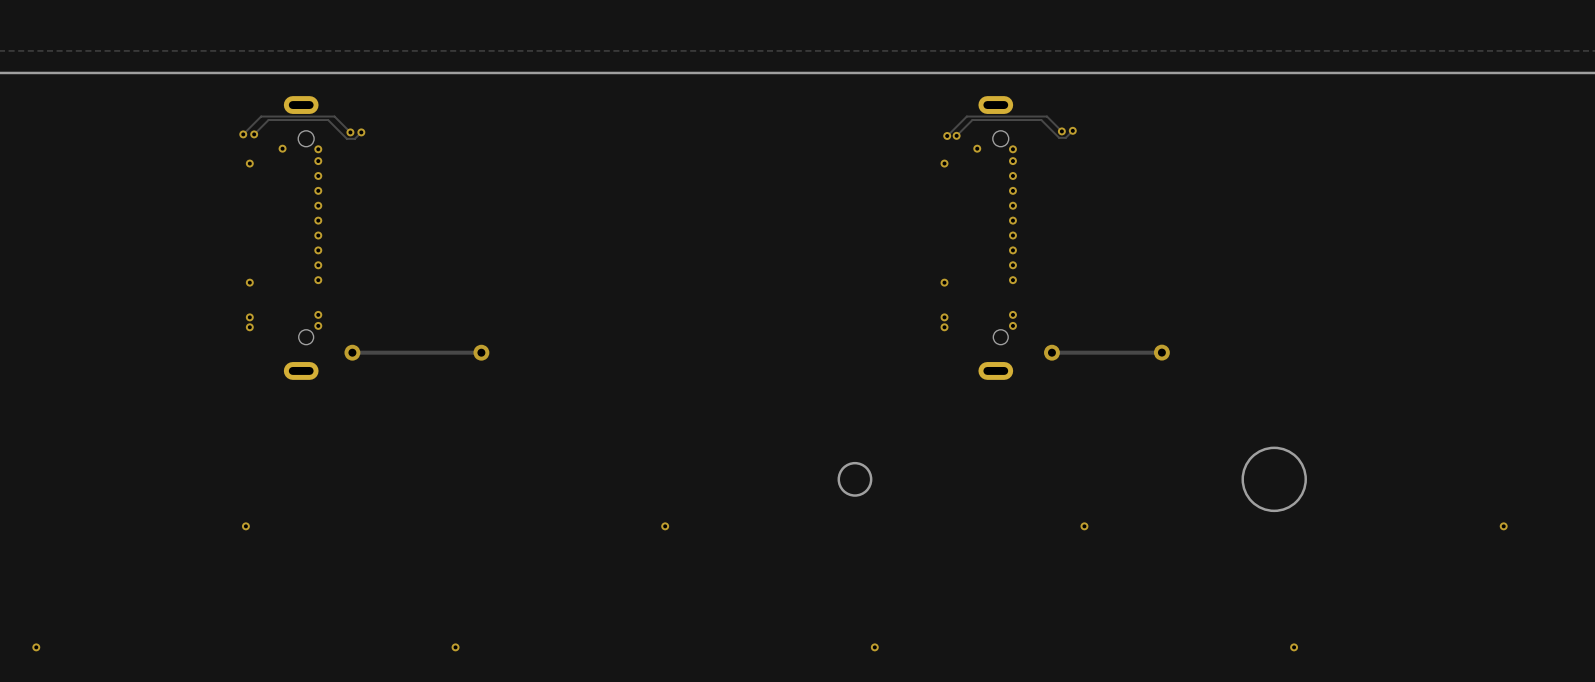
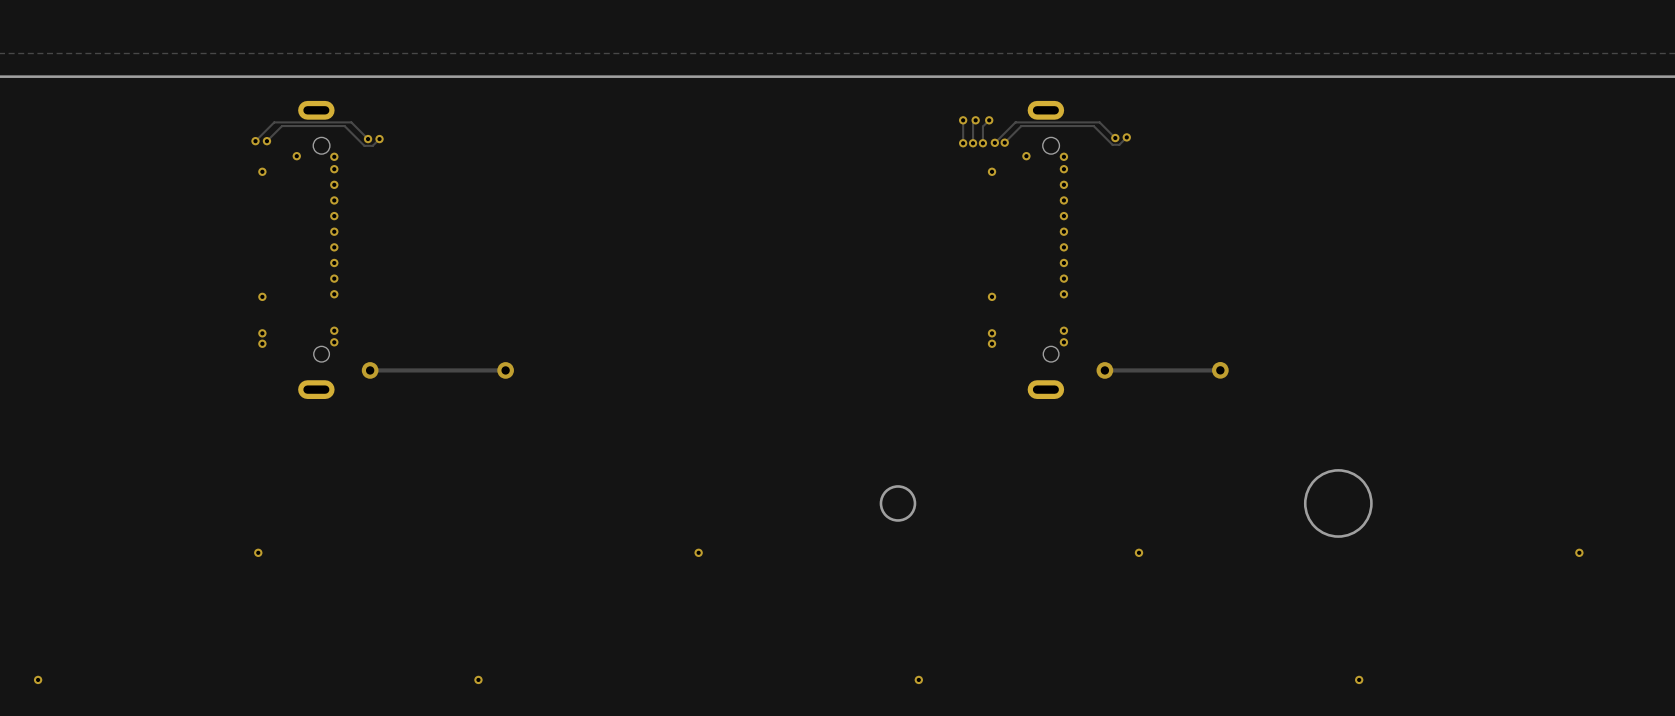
track: none -> (963, 120) (963, 143)
via: none -> (963, 120)
track: none -> (975, 120) (973, 122) (973, 143)
via: none -> (975, 120)
track: none -> (989, 120) (982, 126) (982, 143)
via: none -> (989, 120)
via: none -> (963, 143)
via: none -> (973, 143)
via: none -> (982, 143)

